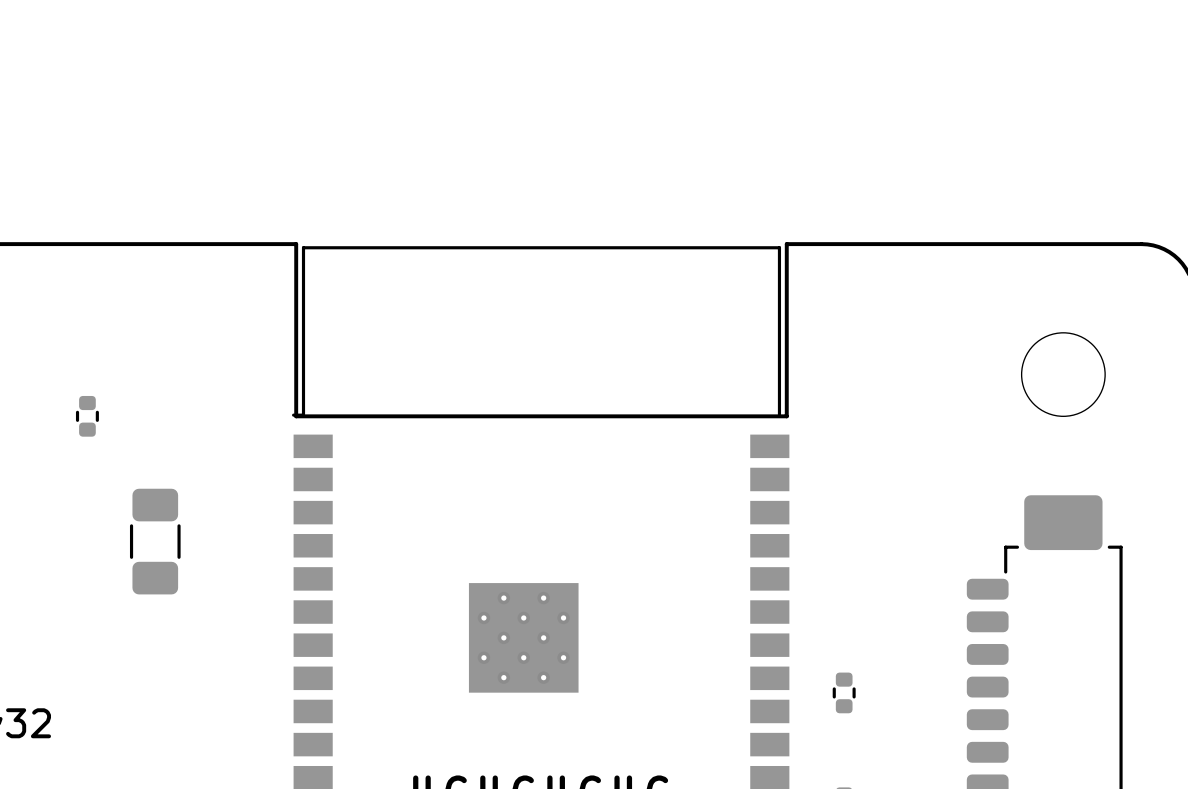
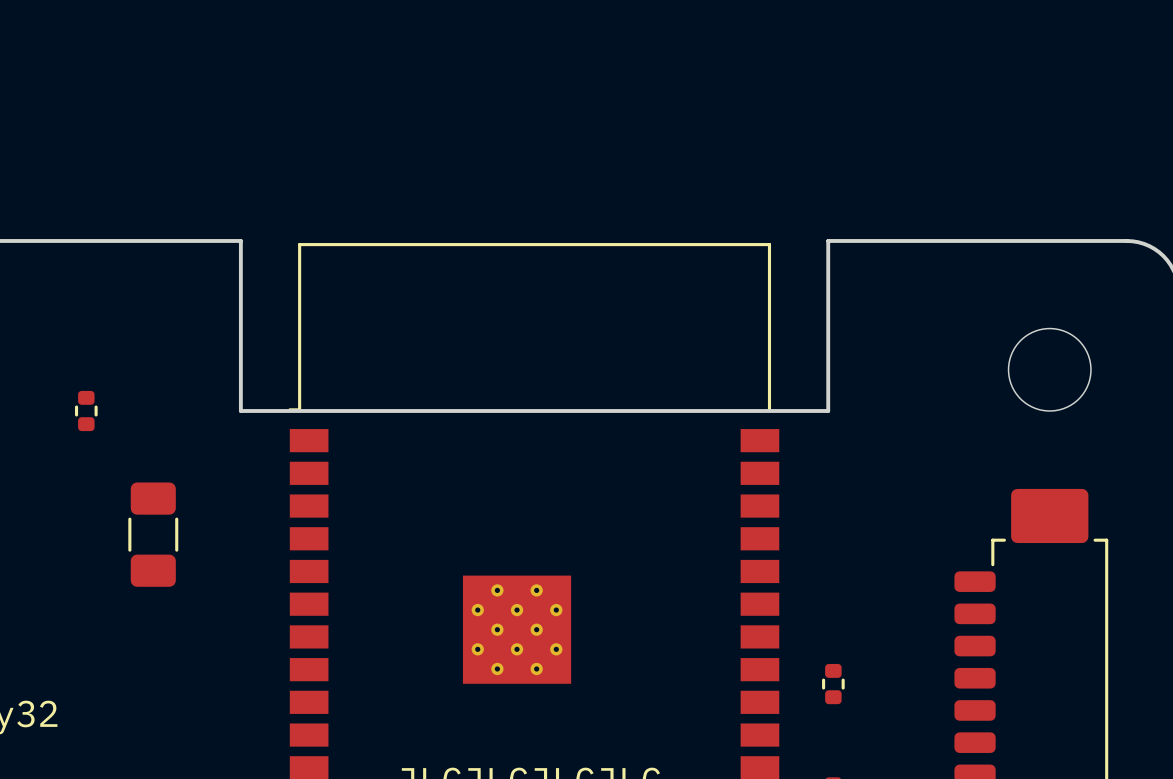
board edge: (244, 244) (296, 244) (296, 416) -> (240, 240) (240, 410) (292, 410)
board edge: (838, 244) (786, 244) (786, 416) -> (828, 240) (828, 410) (776, 410)

